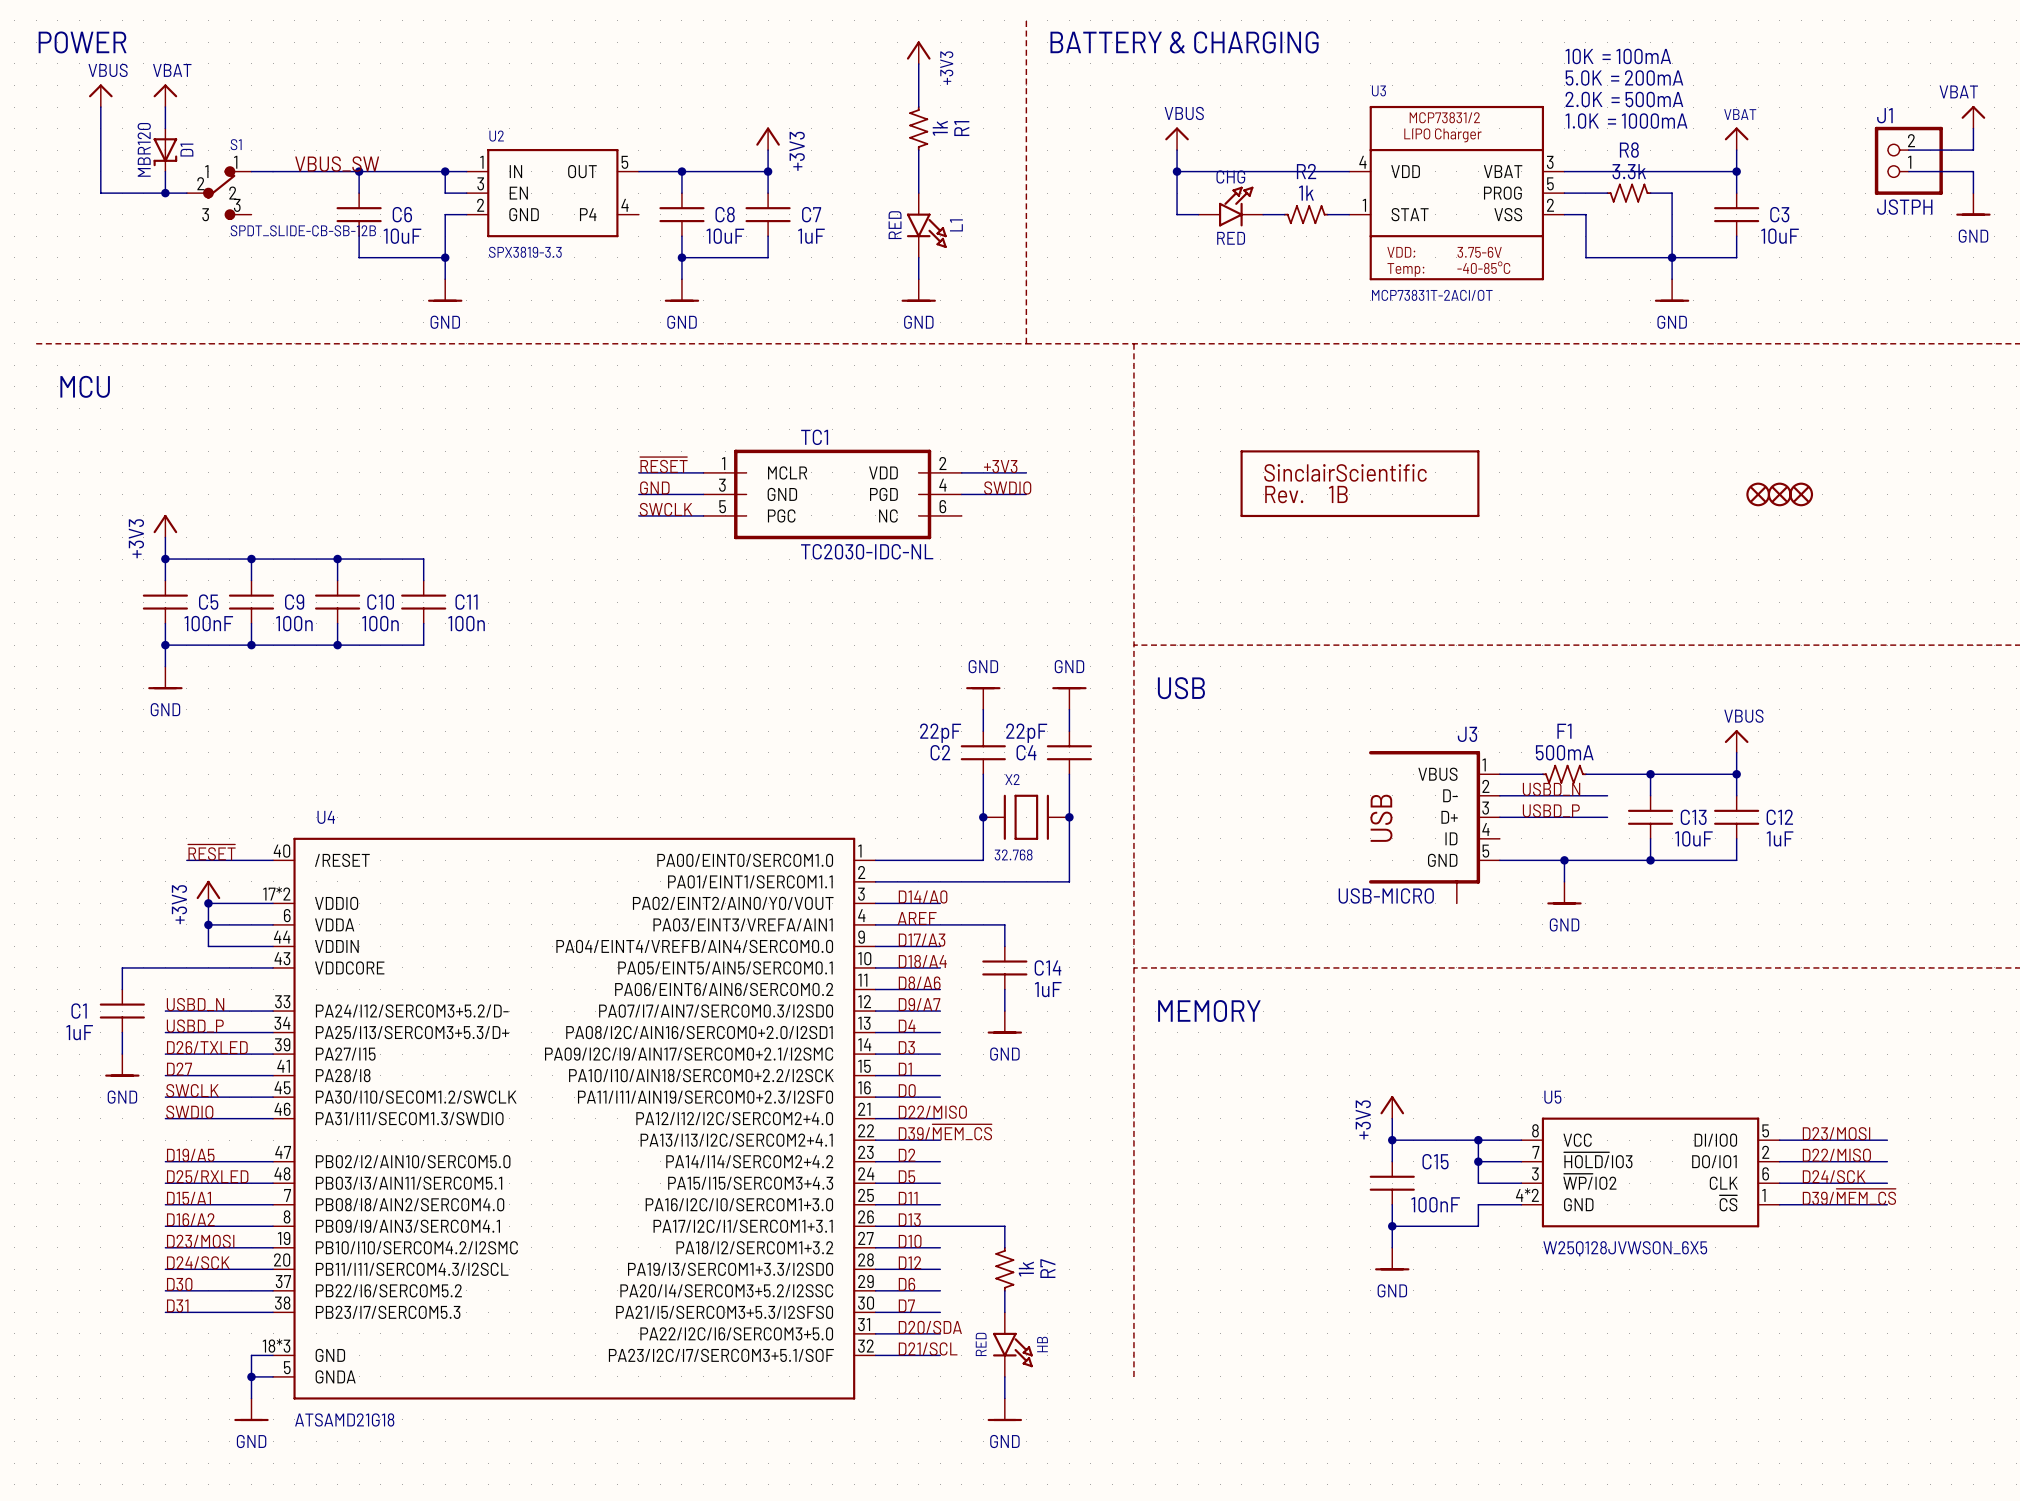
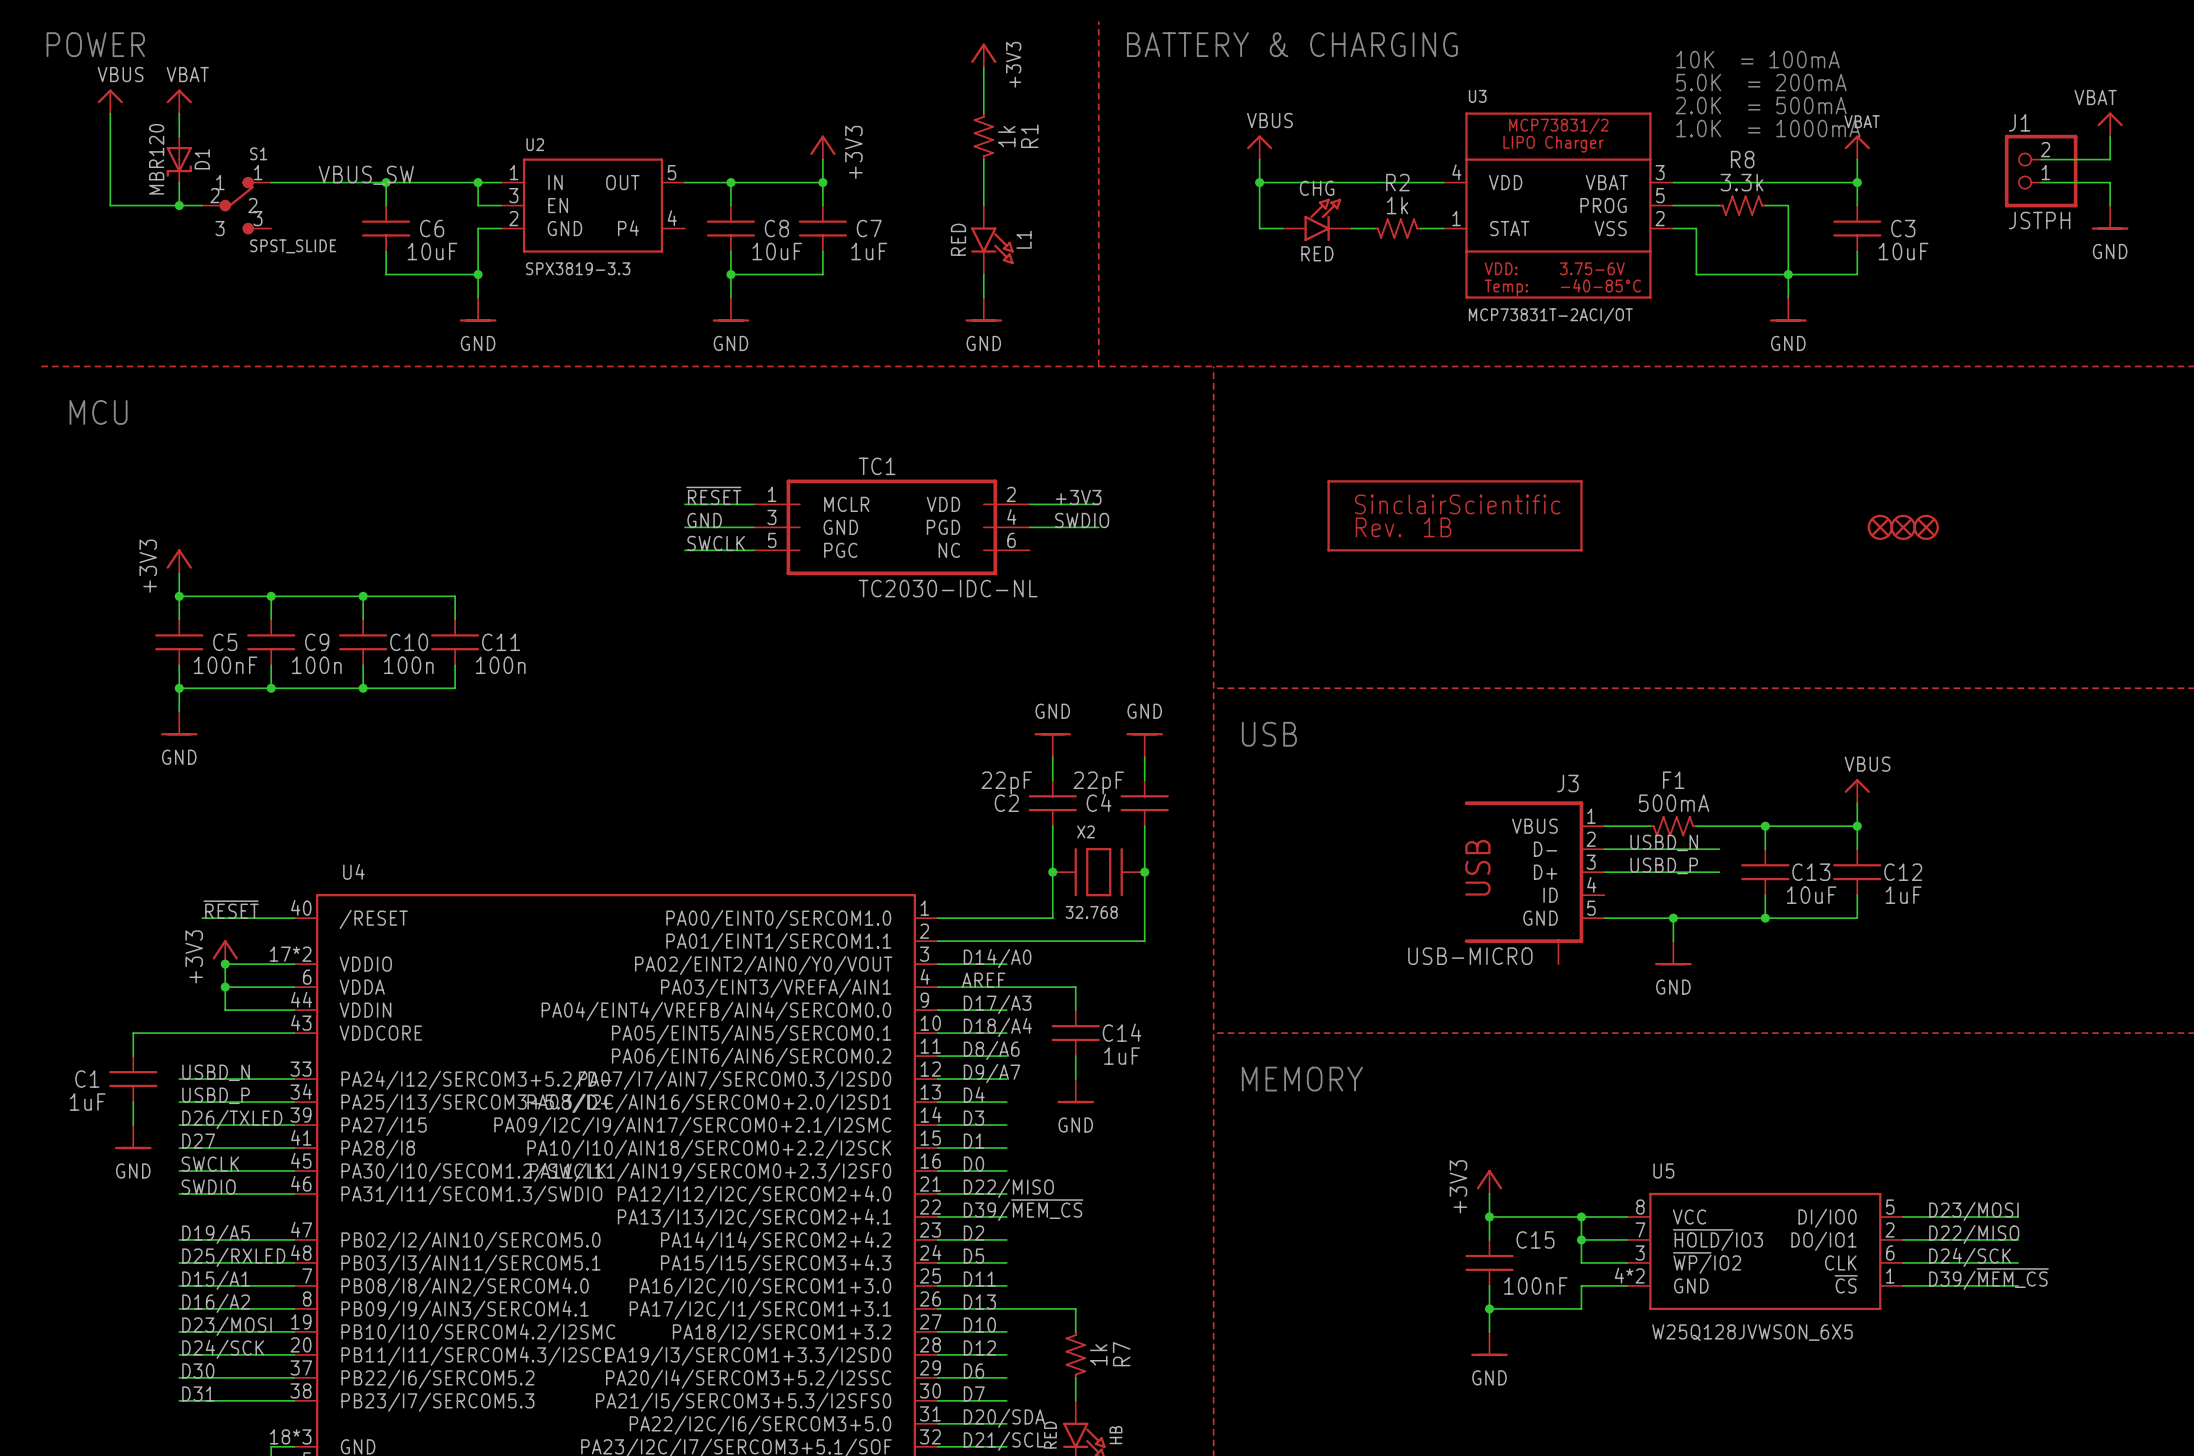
S1 value: SPDT_SLIDE-CB-SB-12B (303, 230) -> SPST_SLIDE (293, 246)

